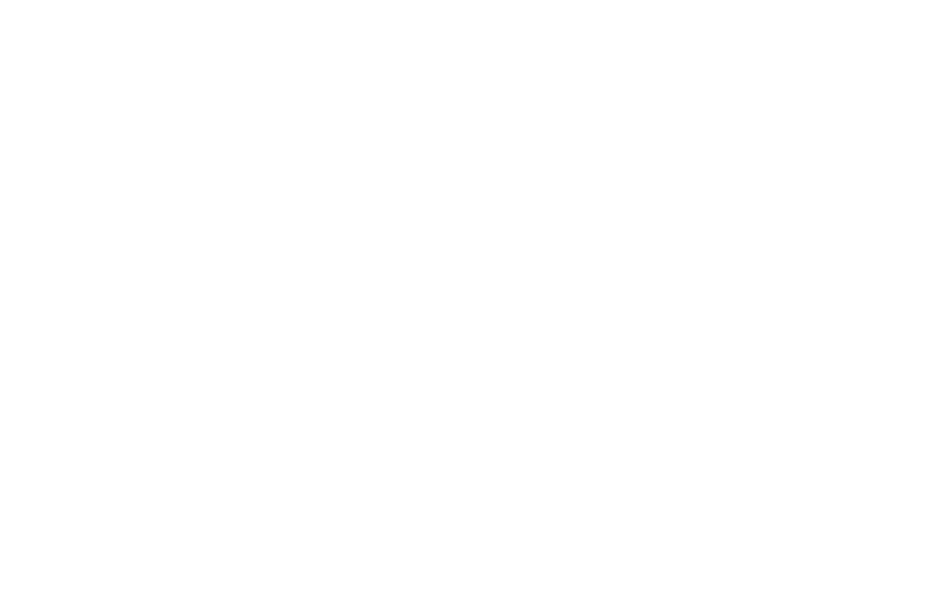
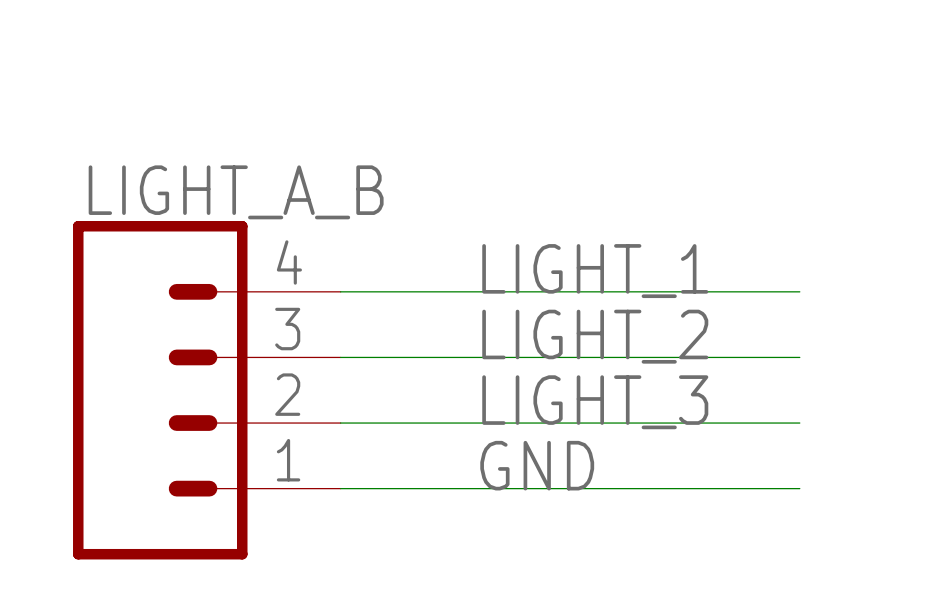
label: none -> LIGHT_1 (595, 271)
wire: none -> (340, 291) (799, 291)
label: none -> LIGHT_2 (595, 336)
wire: none -> (340, 357) (799, 357)
LIGHT_A_B: none -> (206, 390)
label: none -> LIGHT_3 (595, 402)
wire: none -> (340, 423) (799, 423)
label: none -> GND (537, 465)
wire: none -> (340, 488) (799, 488)

